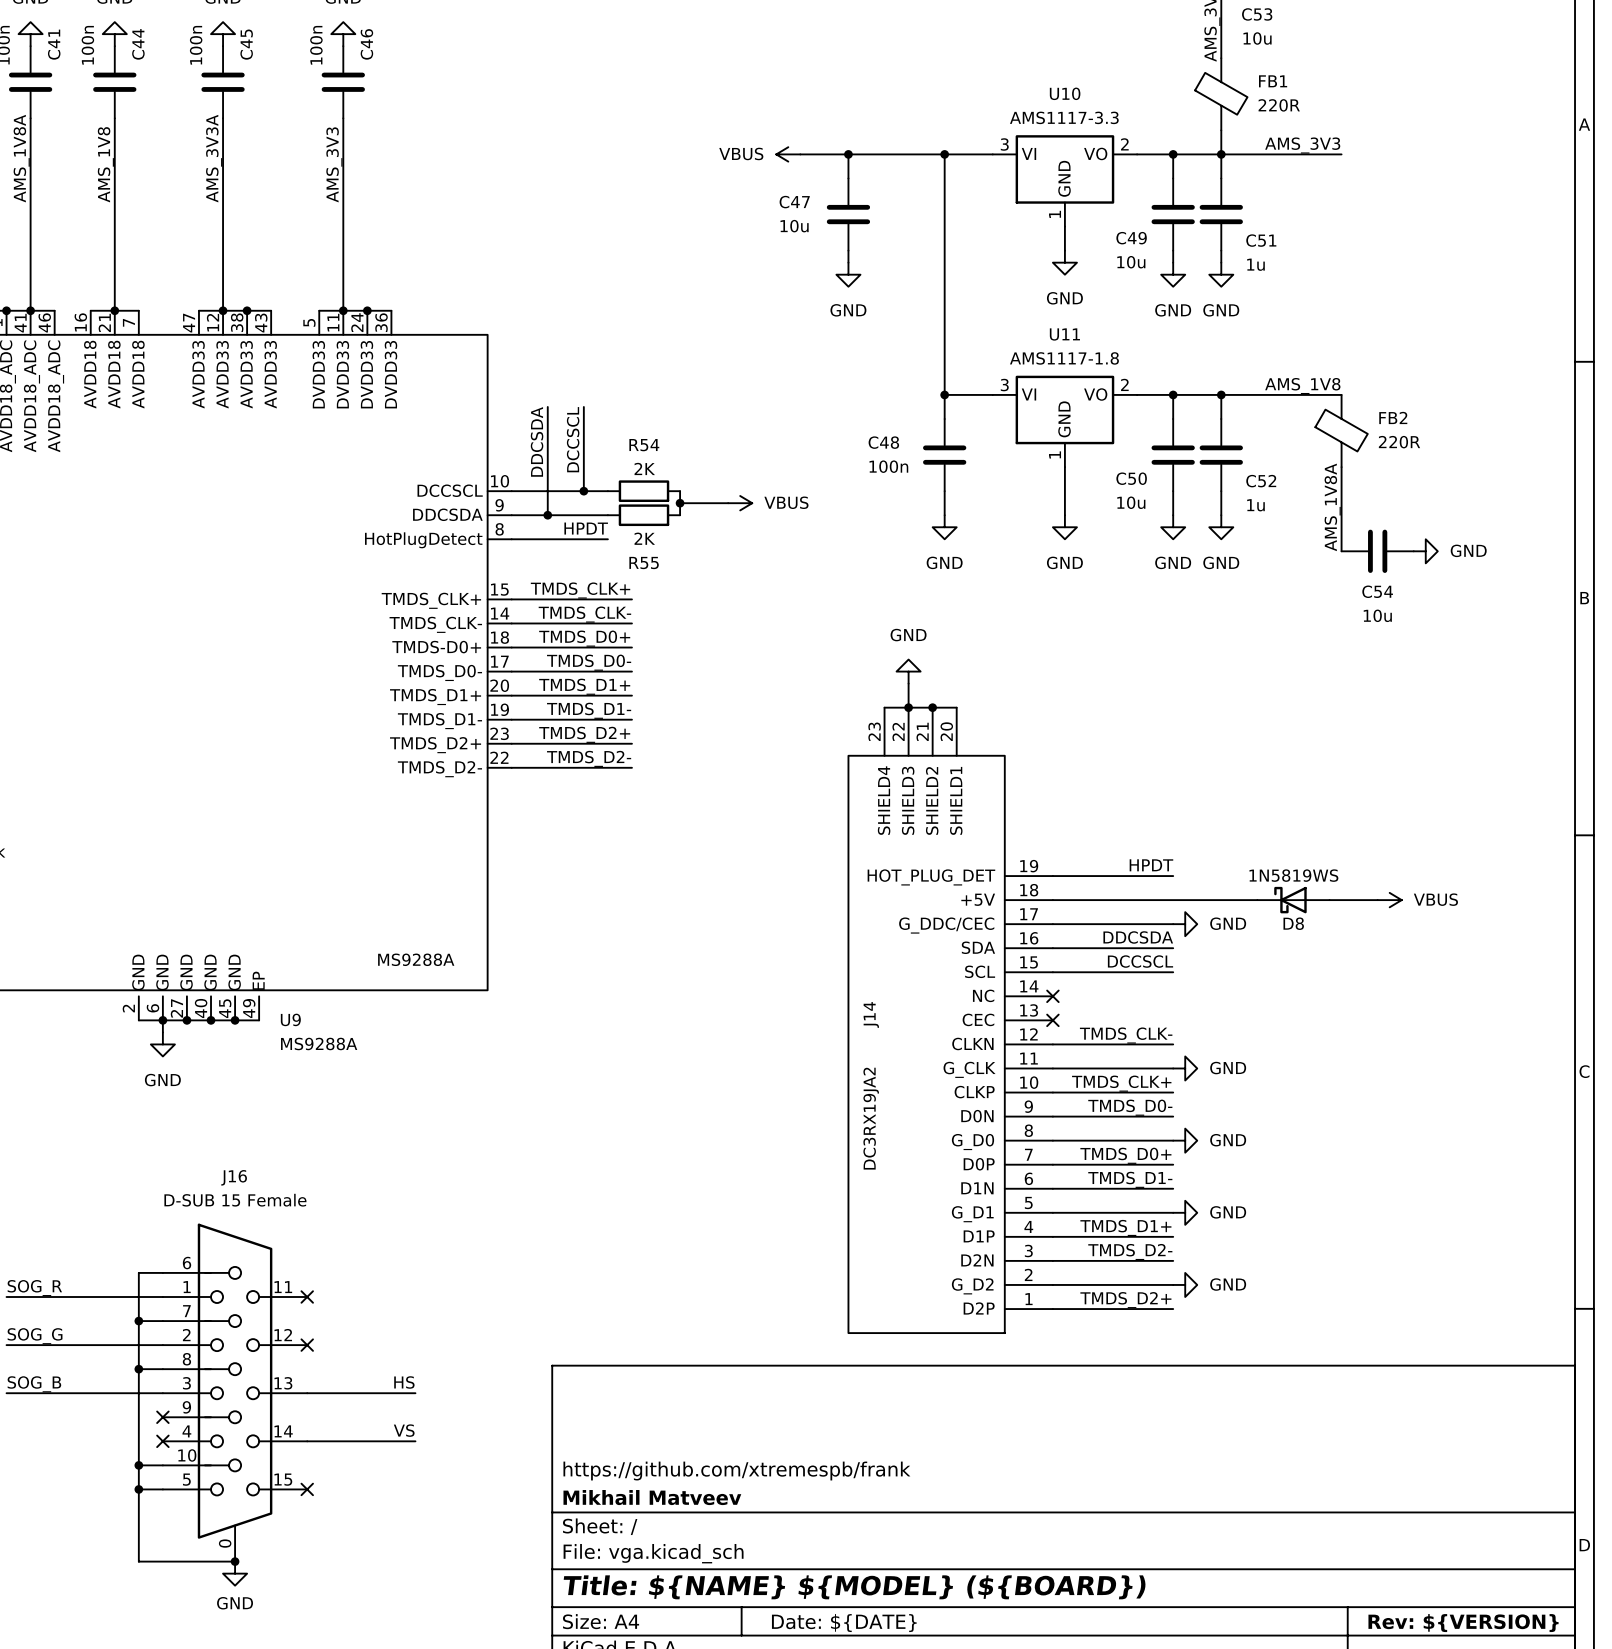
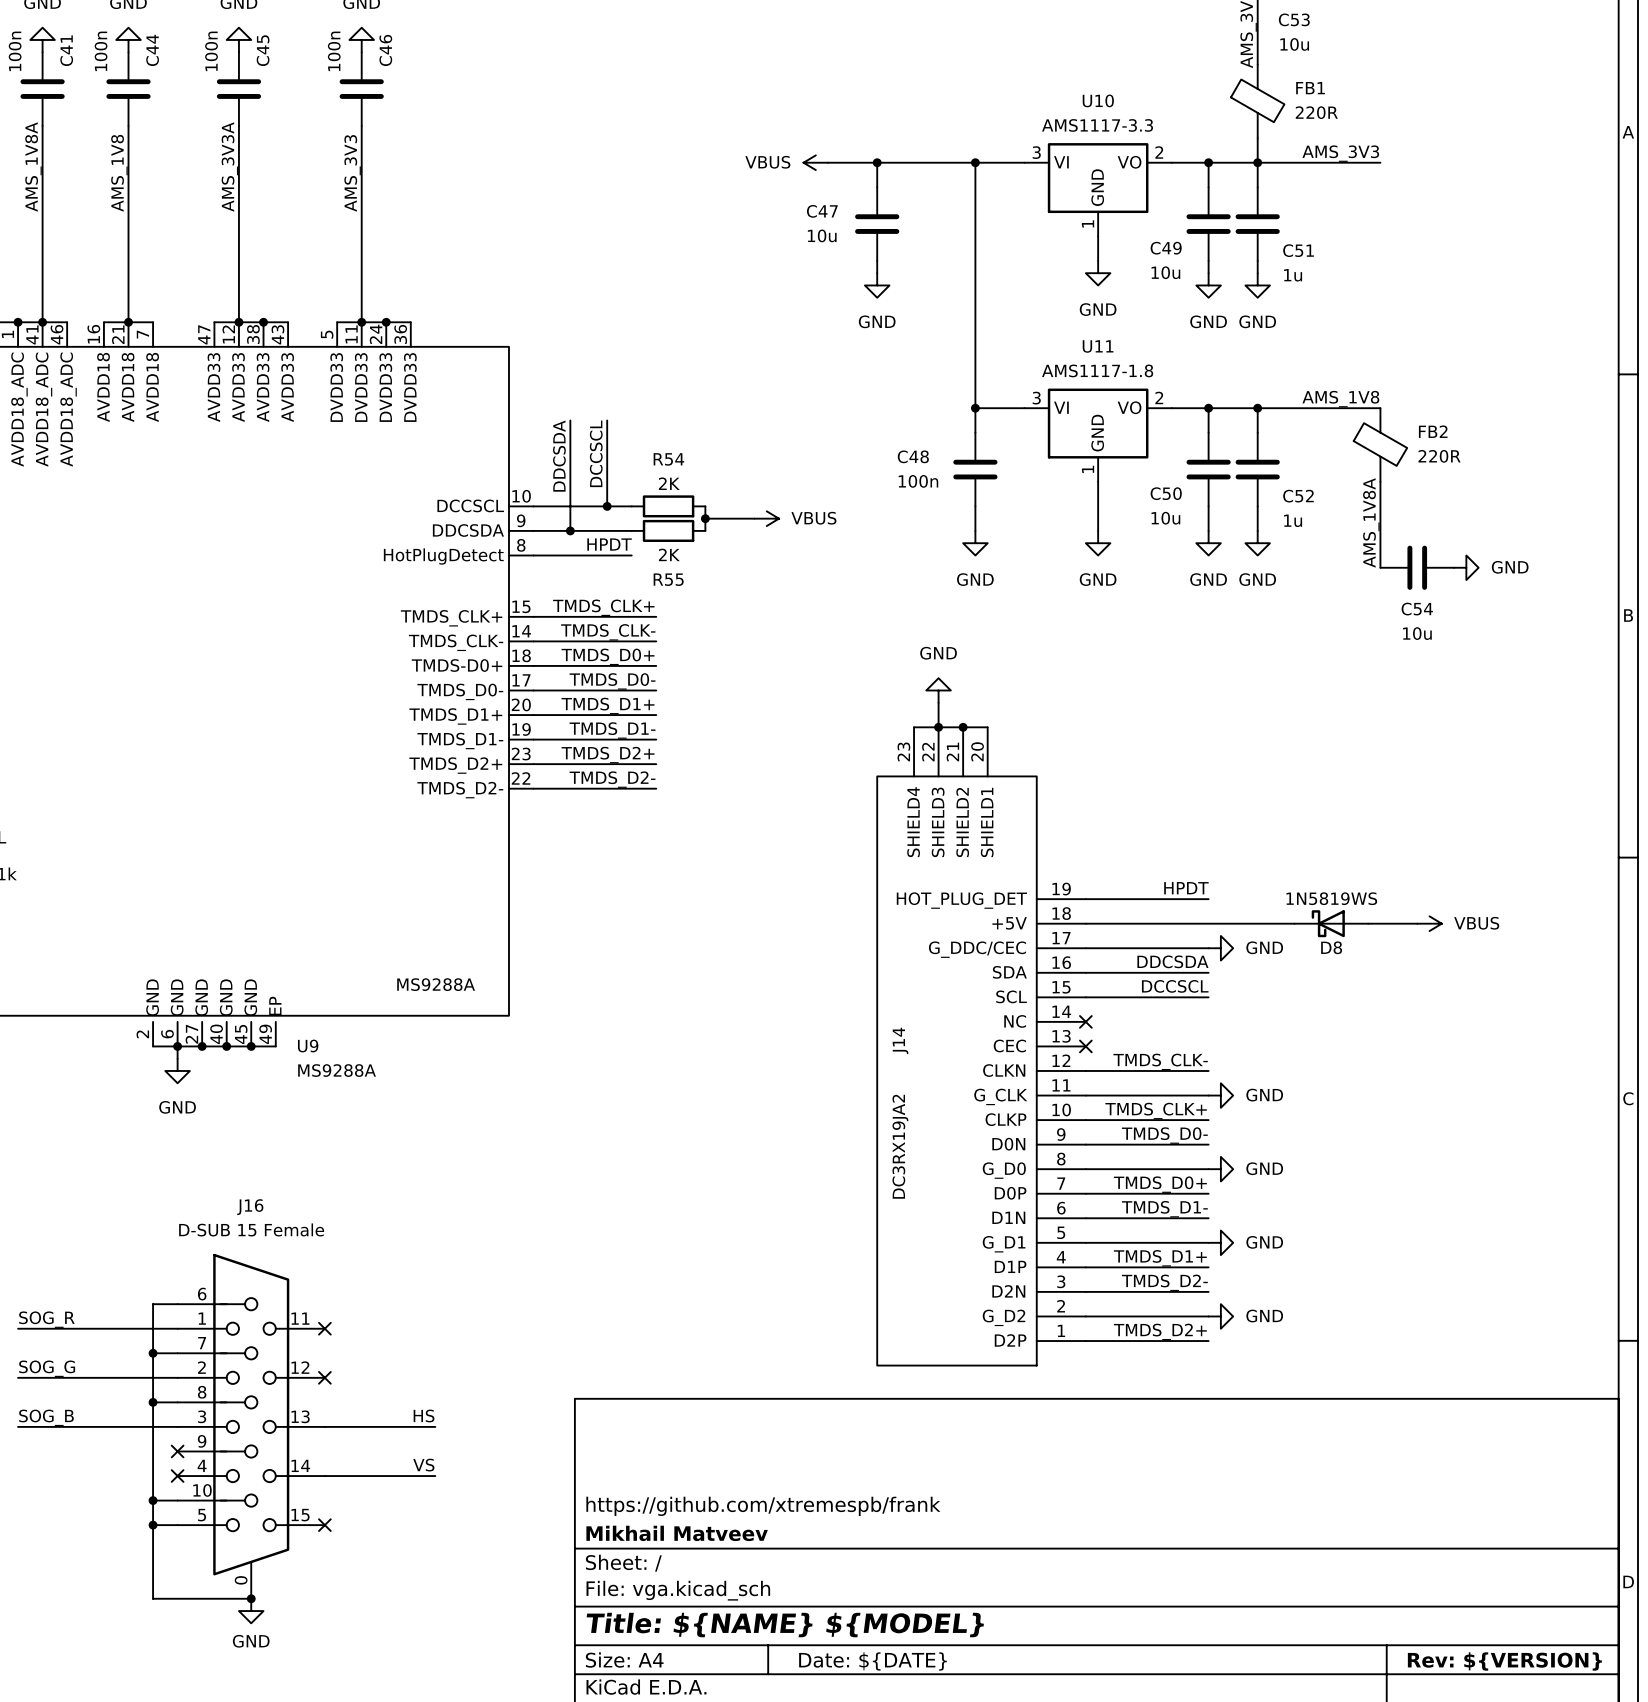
title block: Title: ${NAME} ${MODEL} (${BOARD}) (854, 1587) -> Title: ${NAME} ${MODEL} (785, 1625)

